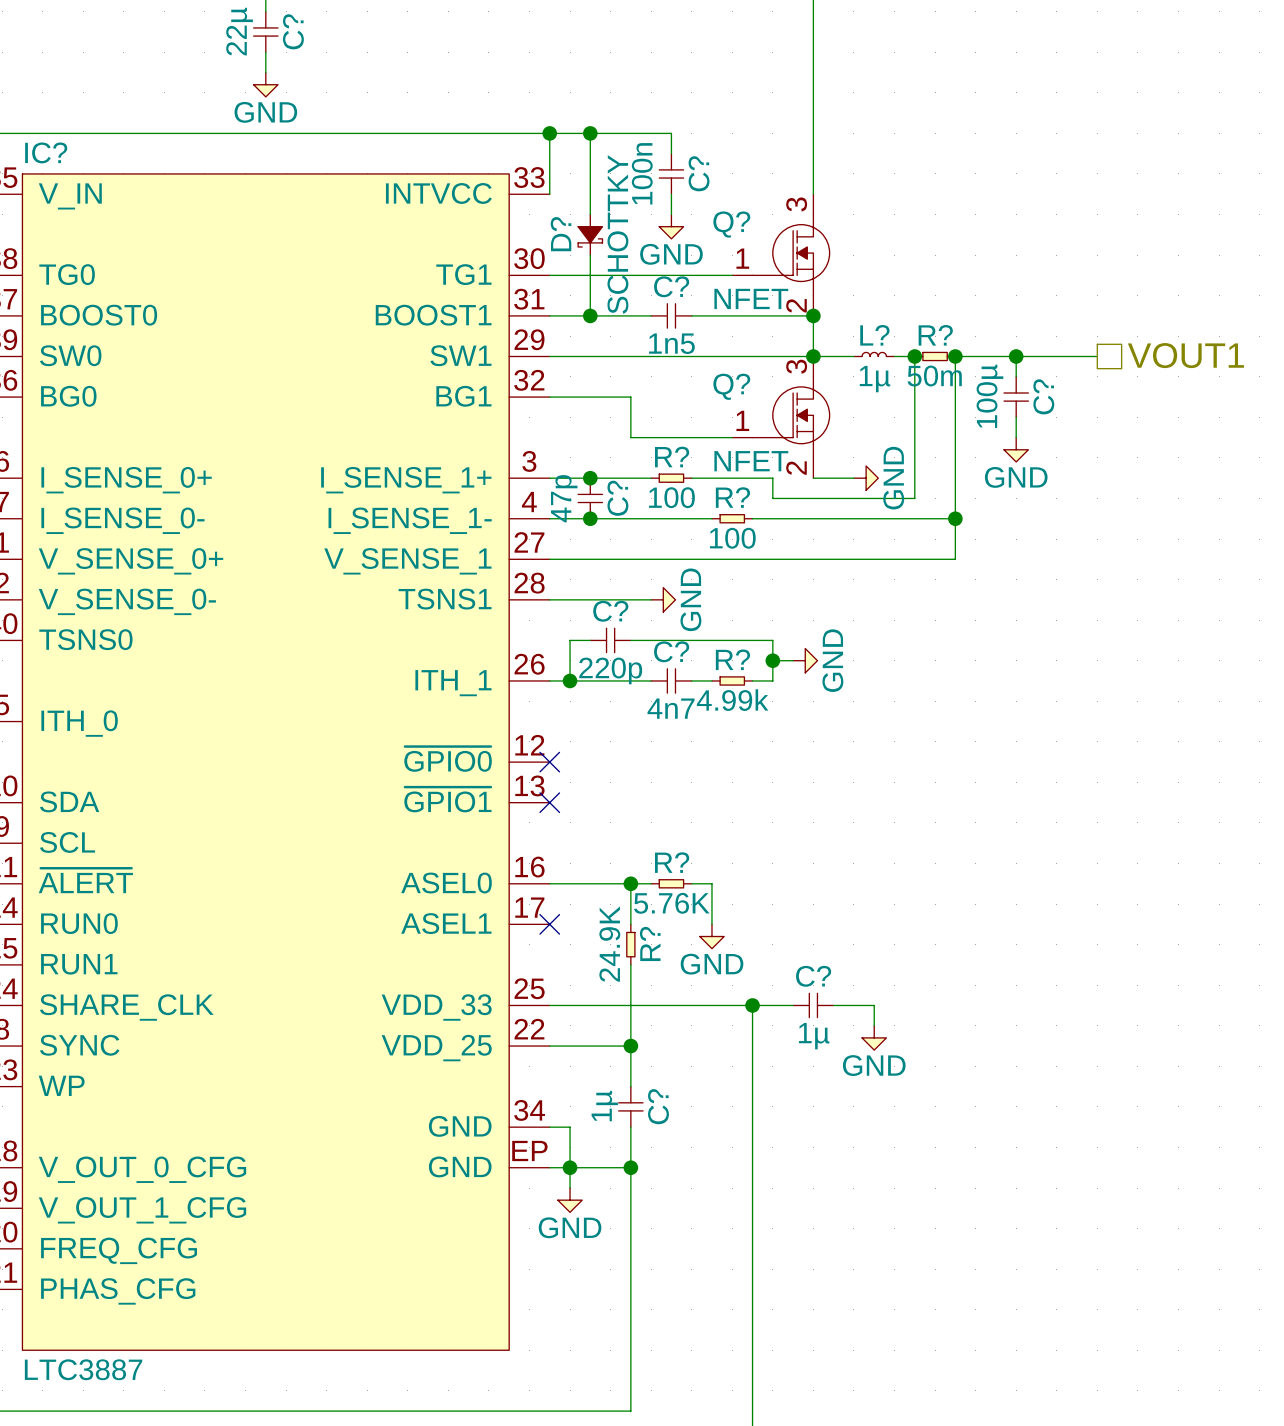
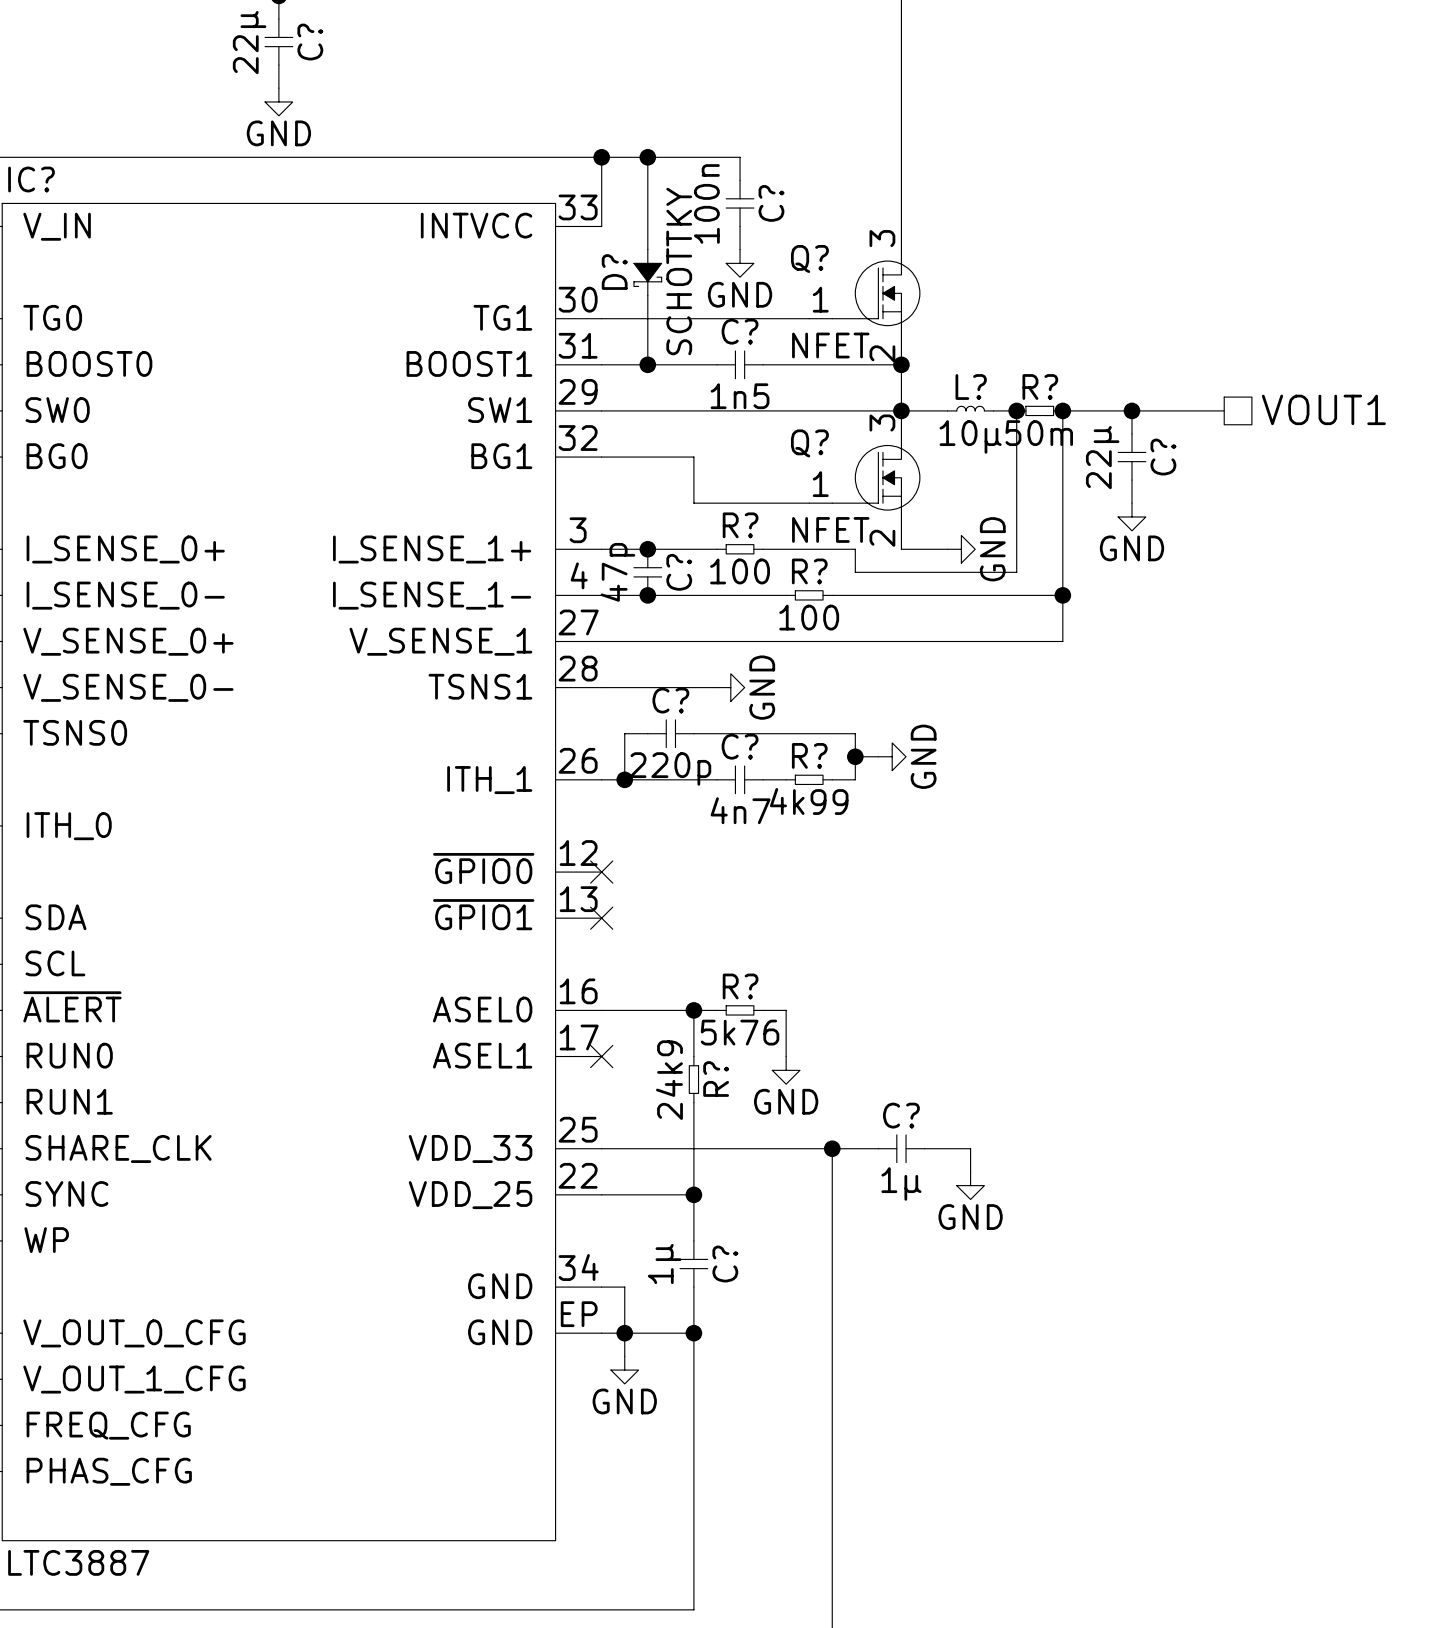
L? value: 1µ (875, 379) -> 10µ (970, 436)
C? value: 100µ (989, 396) -> 22µ (1102, 457)
R? value: 4.99k (732, 700) -> 4k99 (809, 801)
R? value: 5.76K (671, 903) -> 5k76 (740, 1032)
R? value: 24.9K (609, 944) -> 24k9 (669, 1080)

